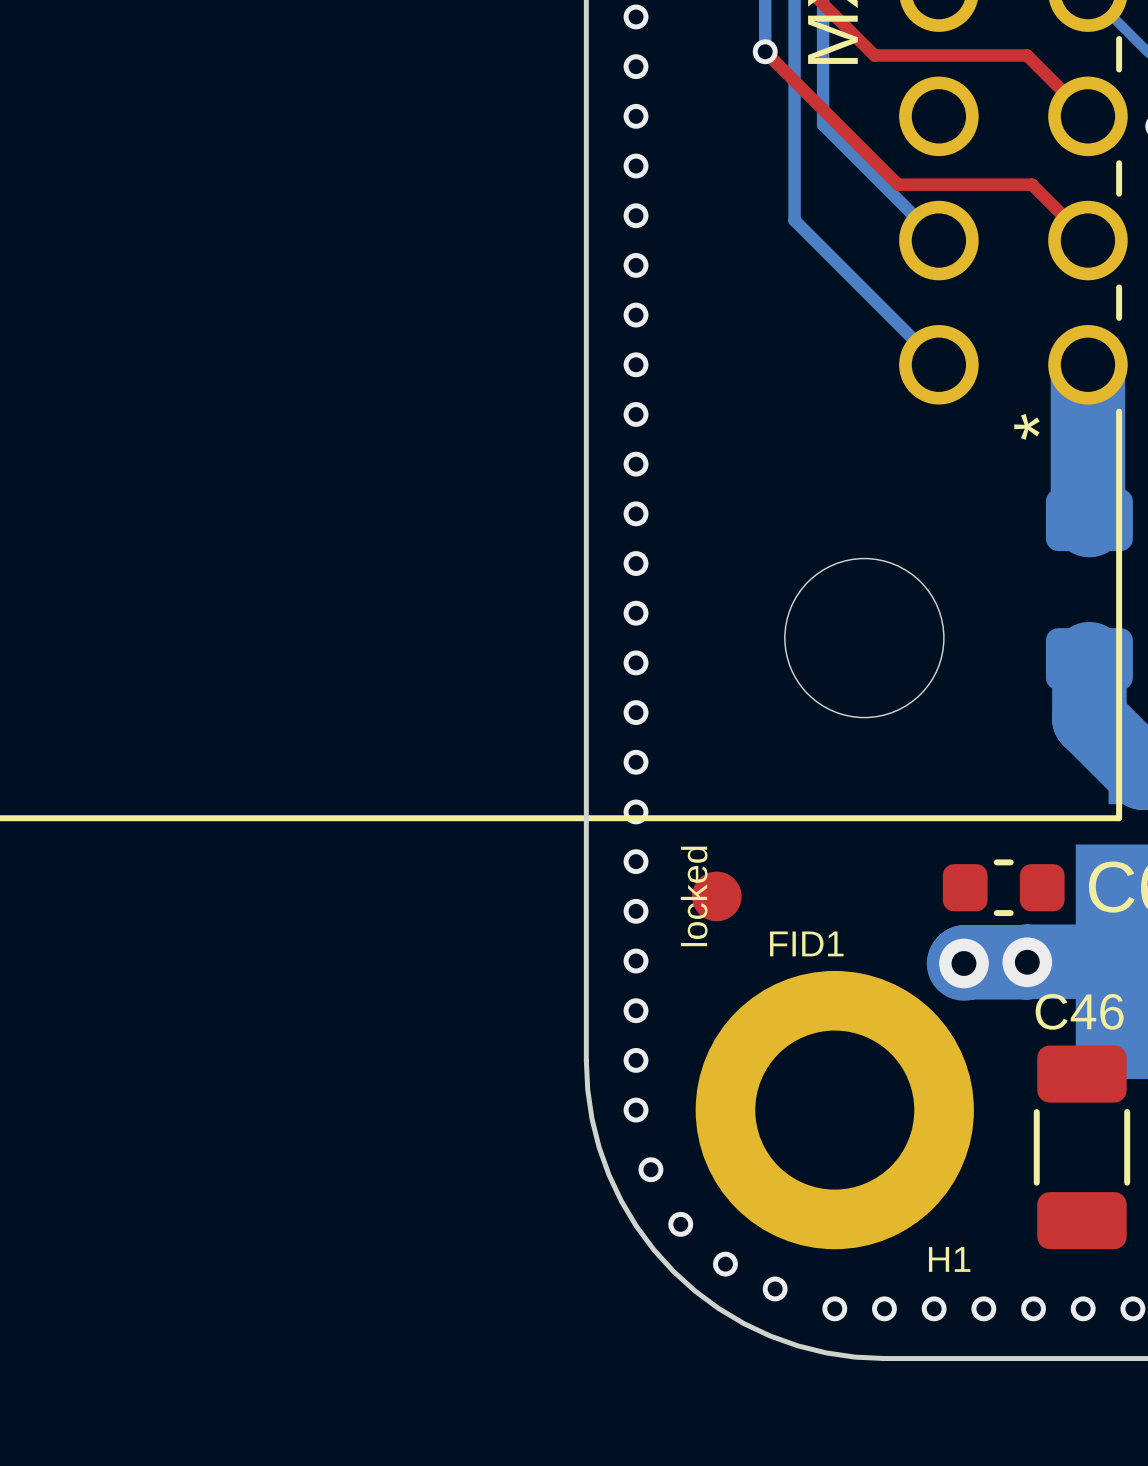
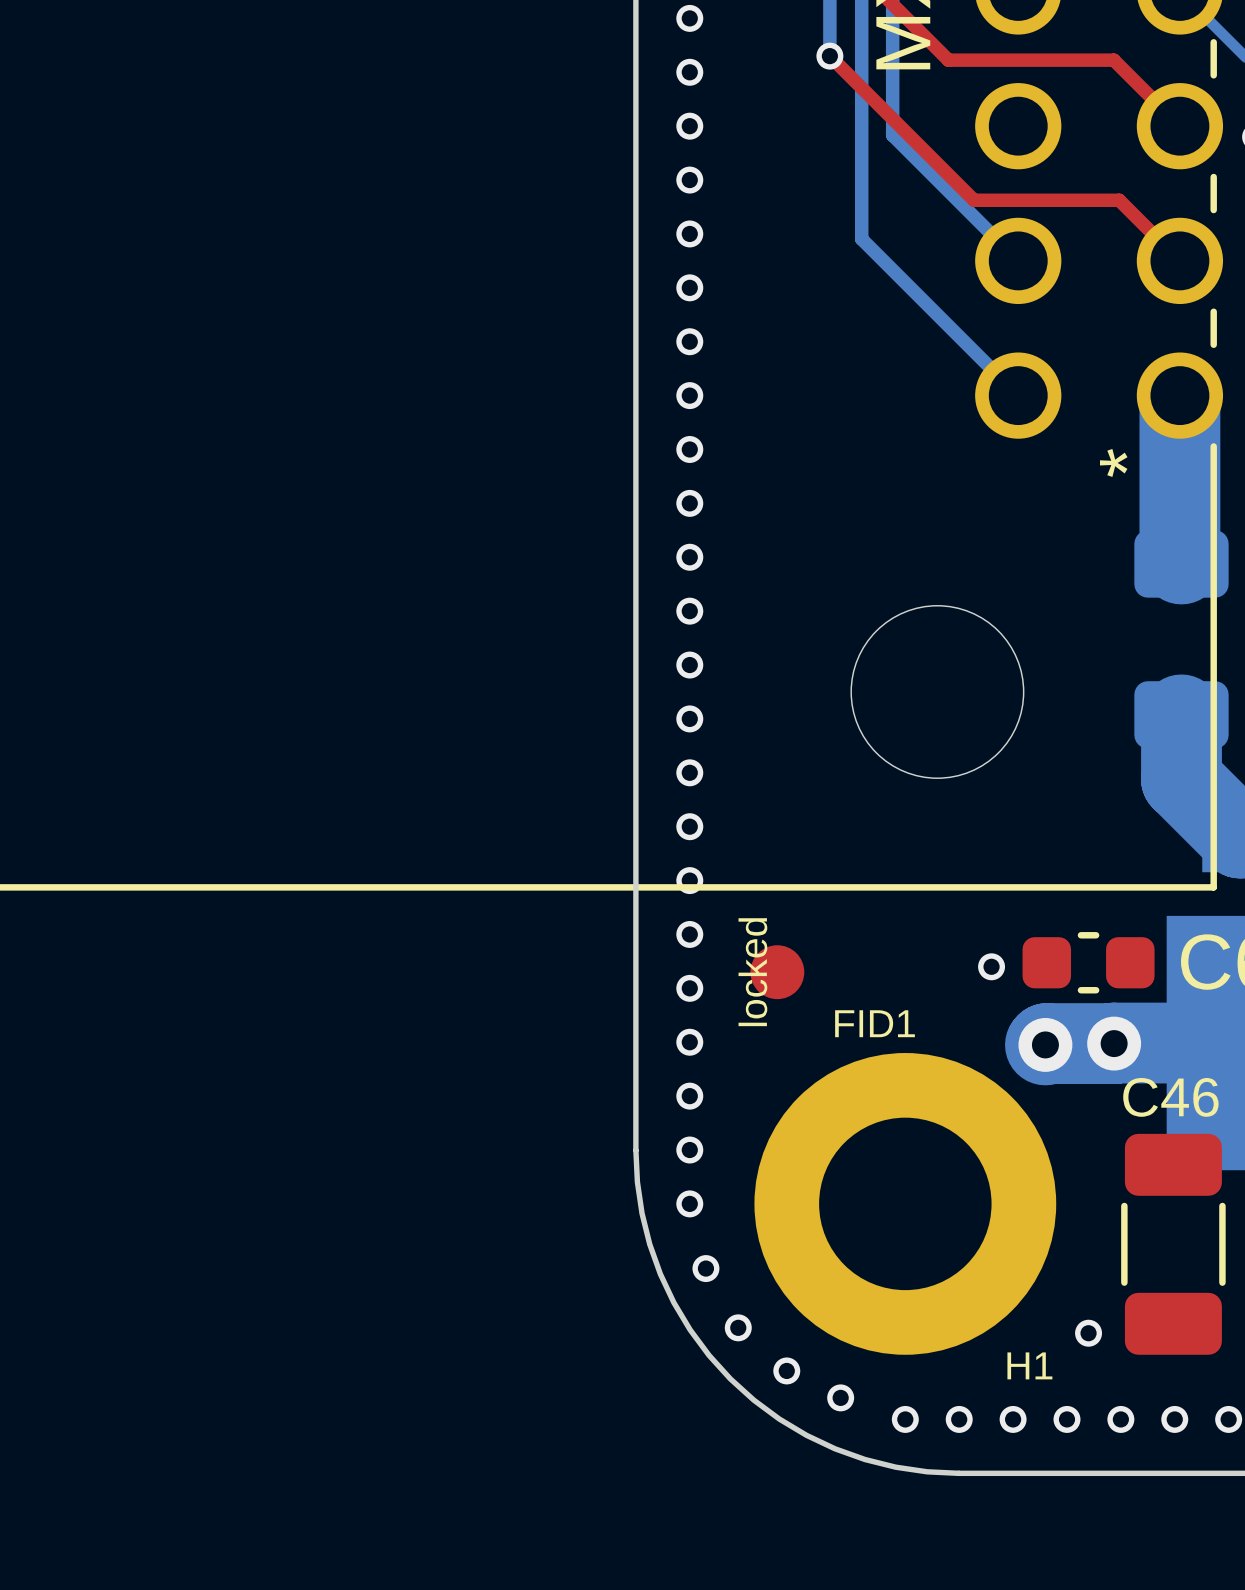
via: none -> (991, 966)
via: none -> (1088, 1333)

